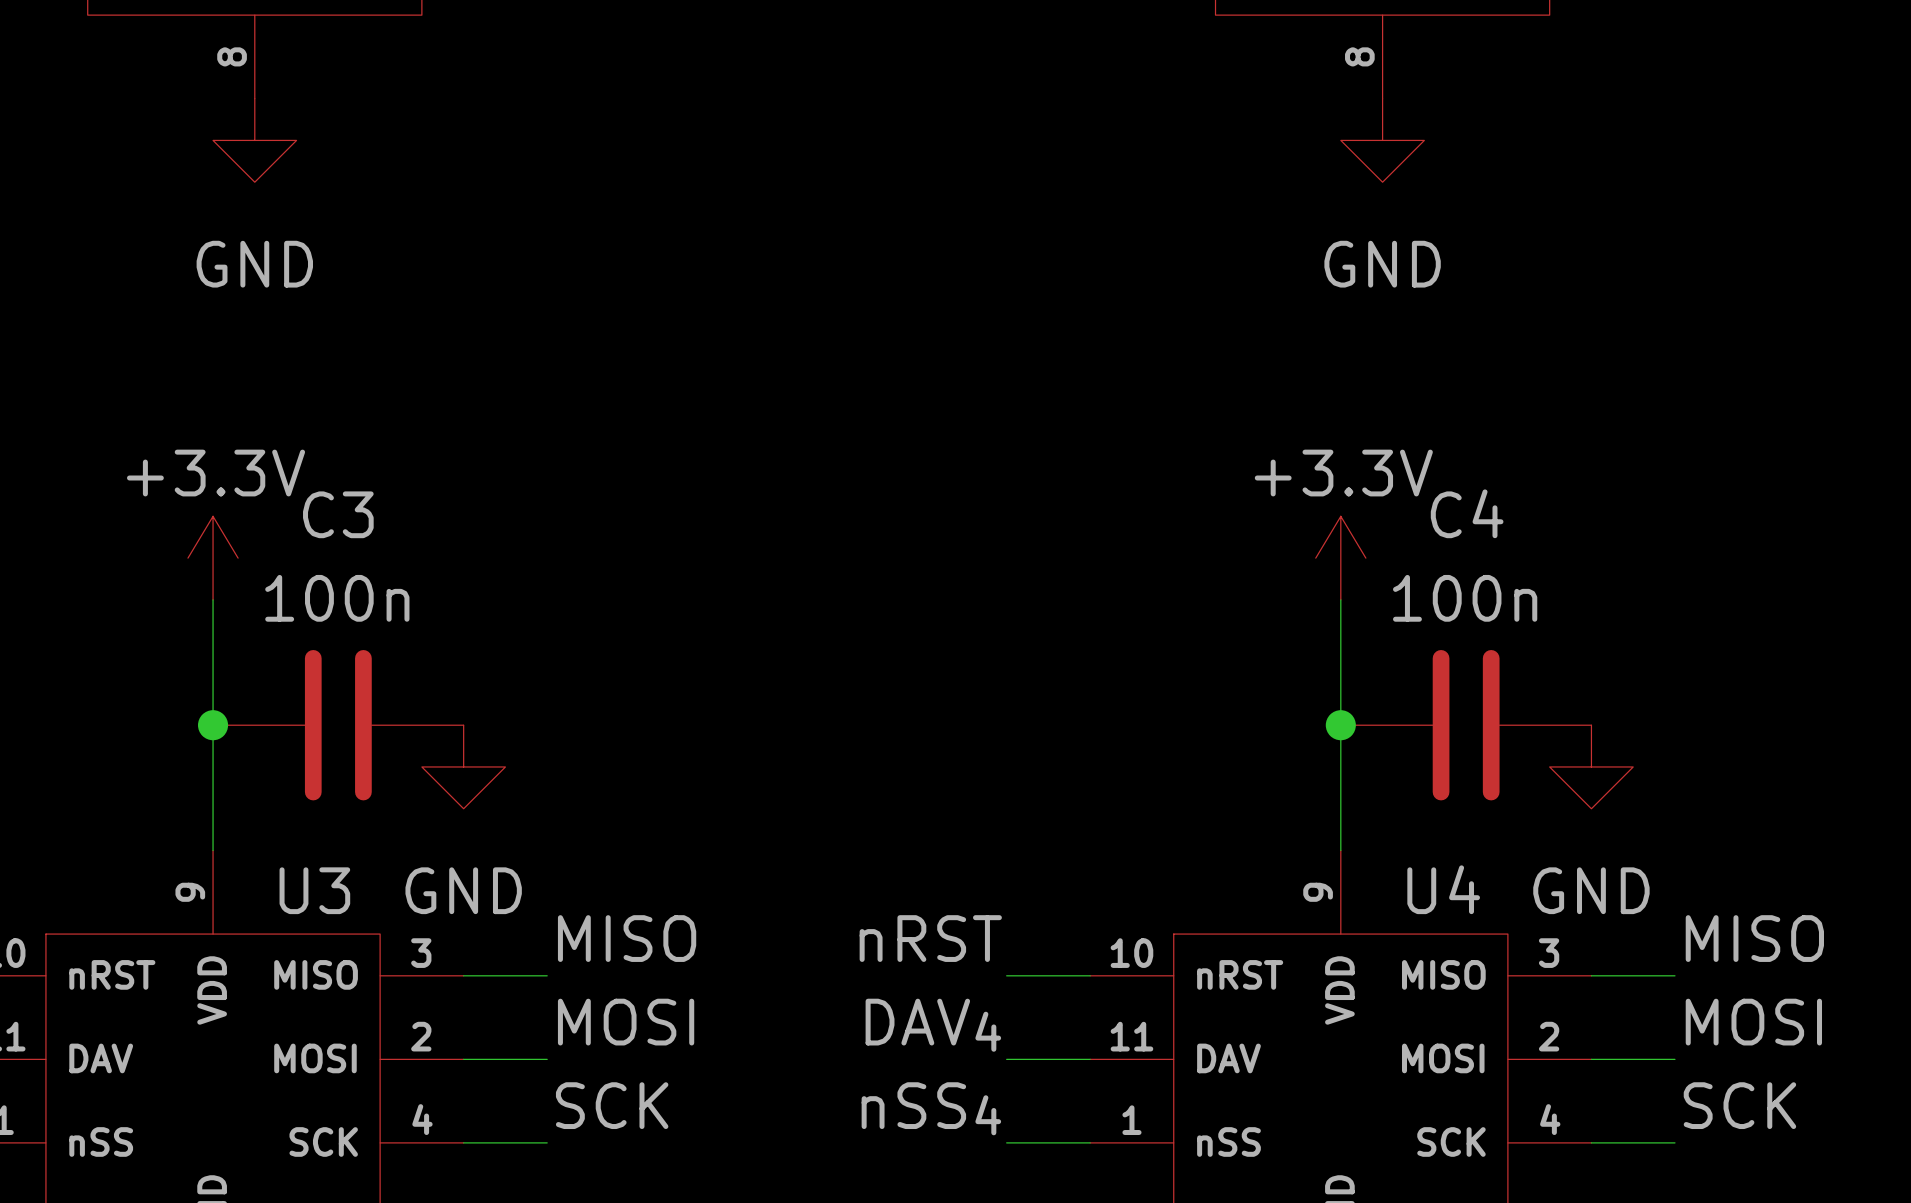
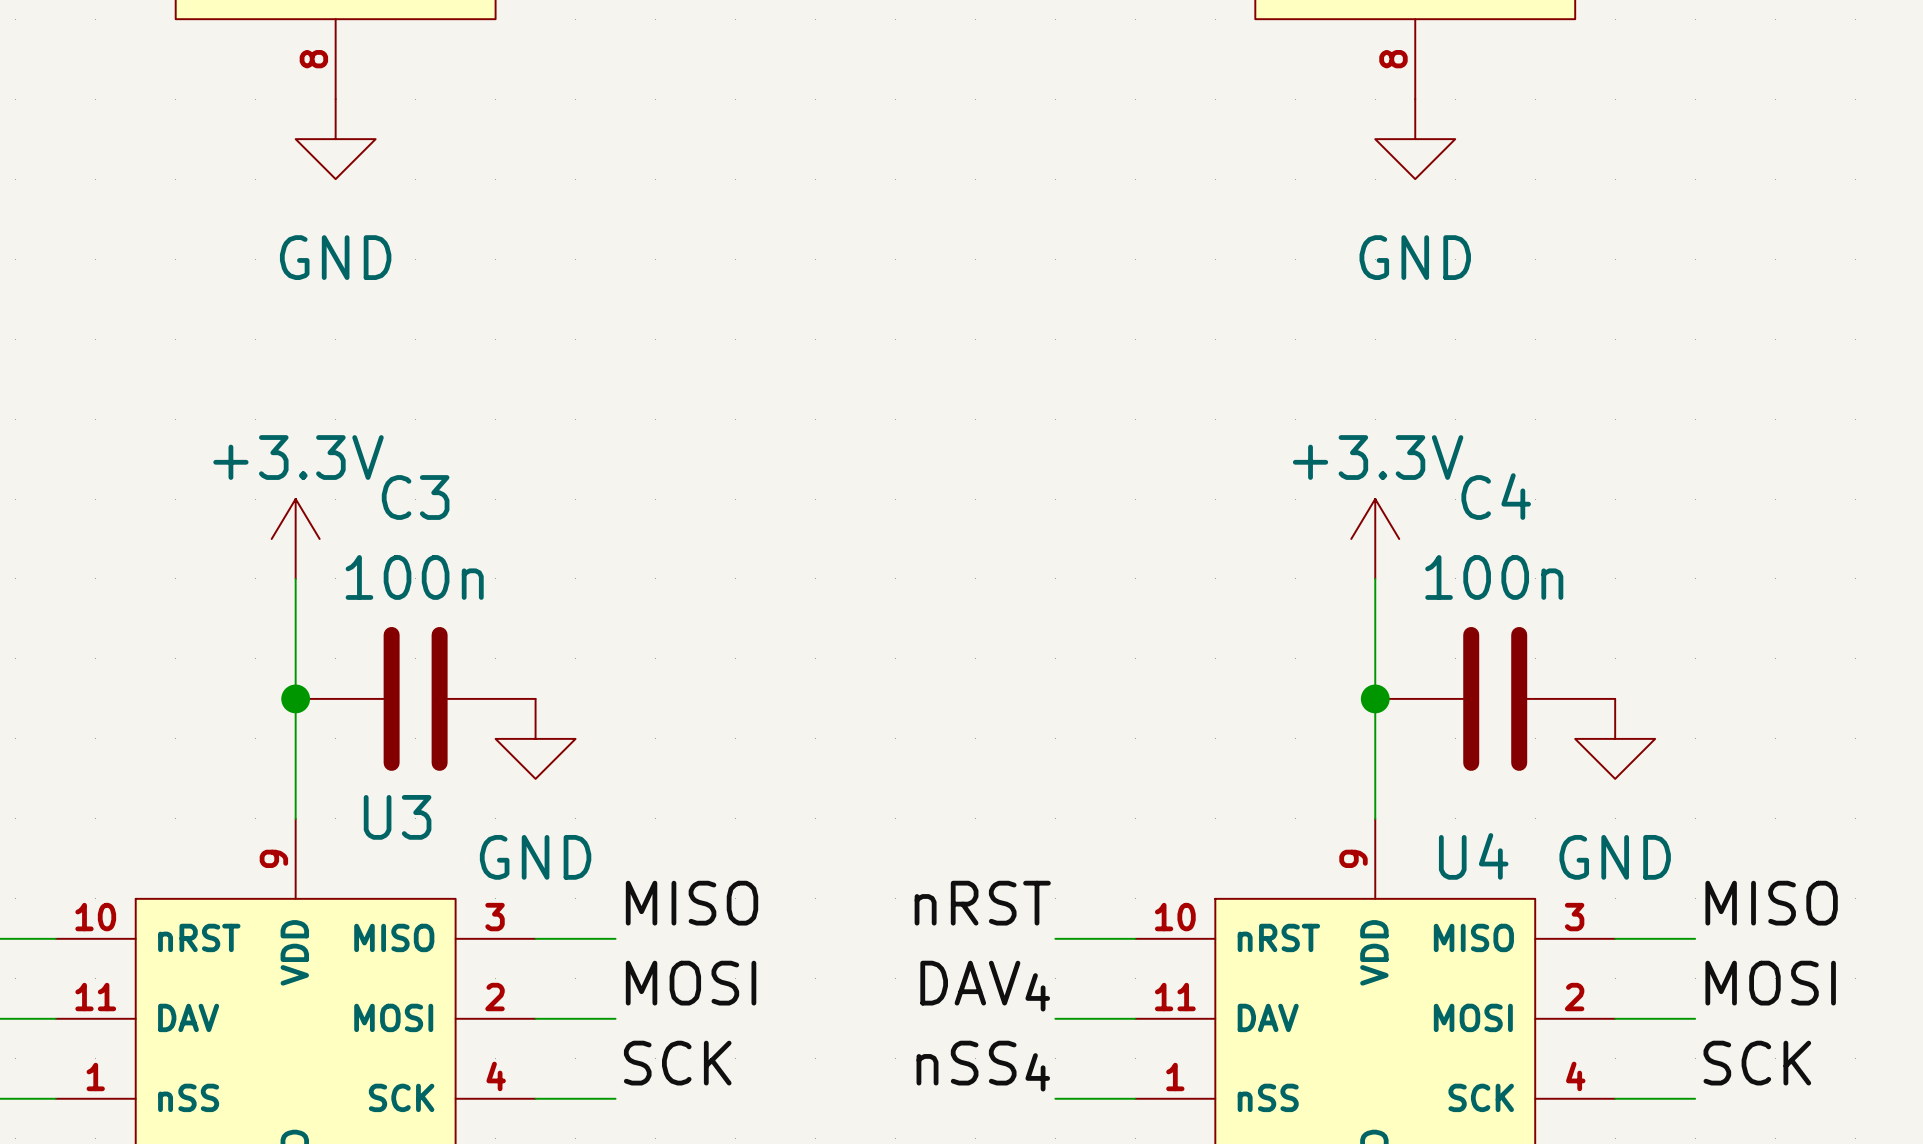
U3 name position: U3 (314, 890) -> U3 (397, 817)

